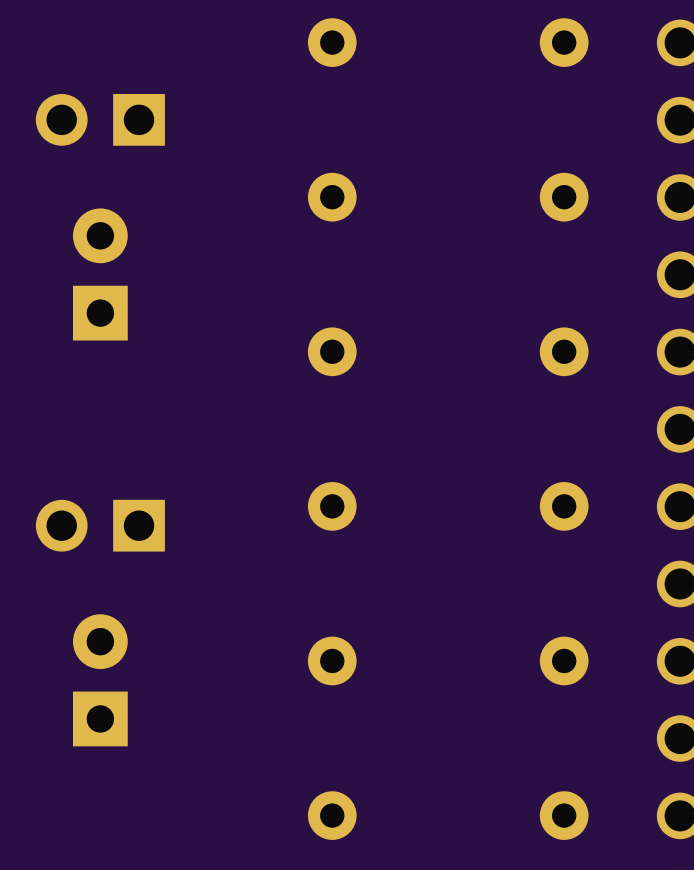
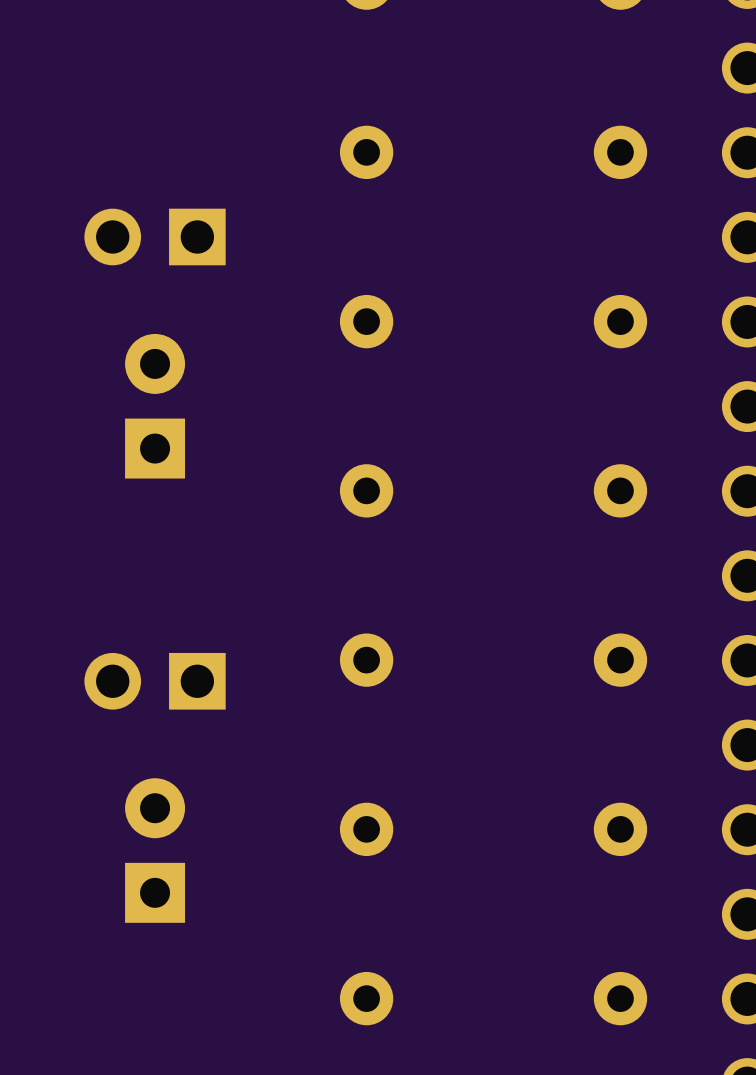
part position: (100, 119) -> (155, 236)
part position: (100, 274) -> (155, 406)
part position: (100, 525) -> (155, 681)
part position: (100, 680) -> (155, 850)

